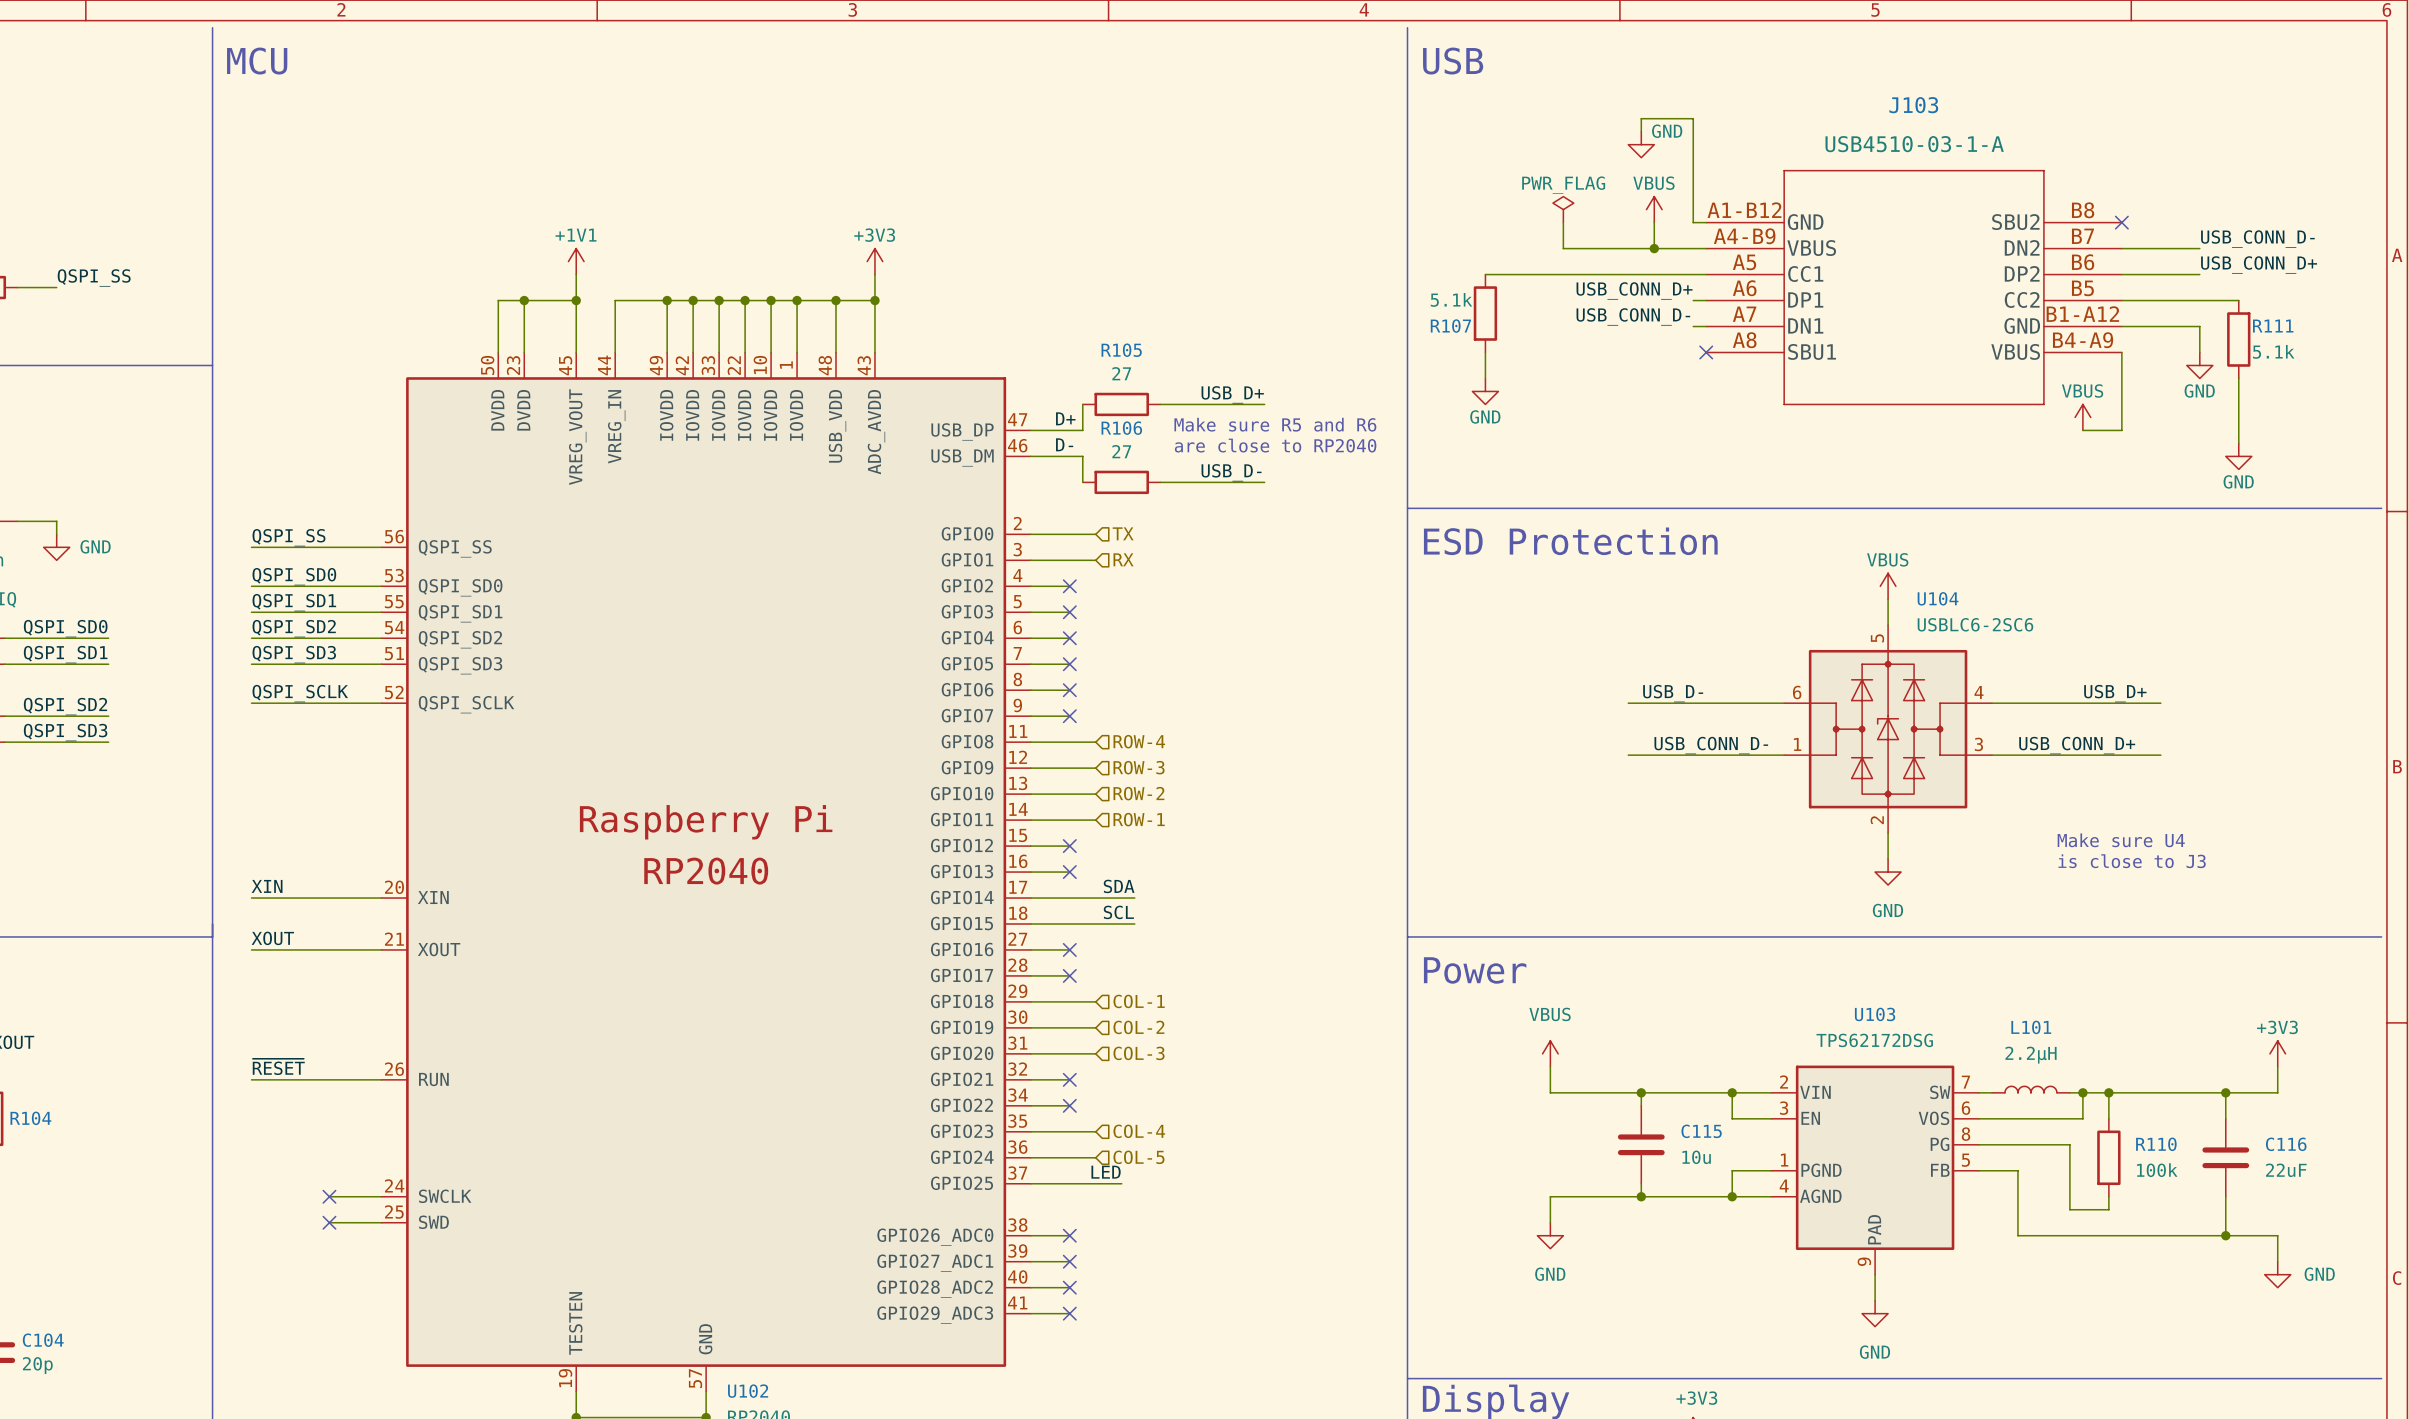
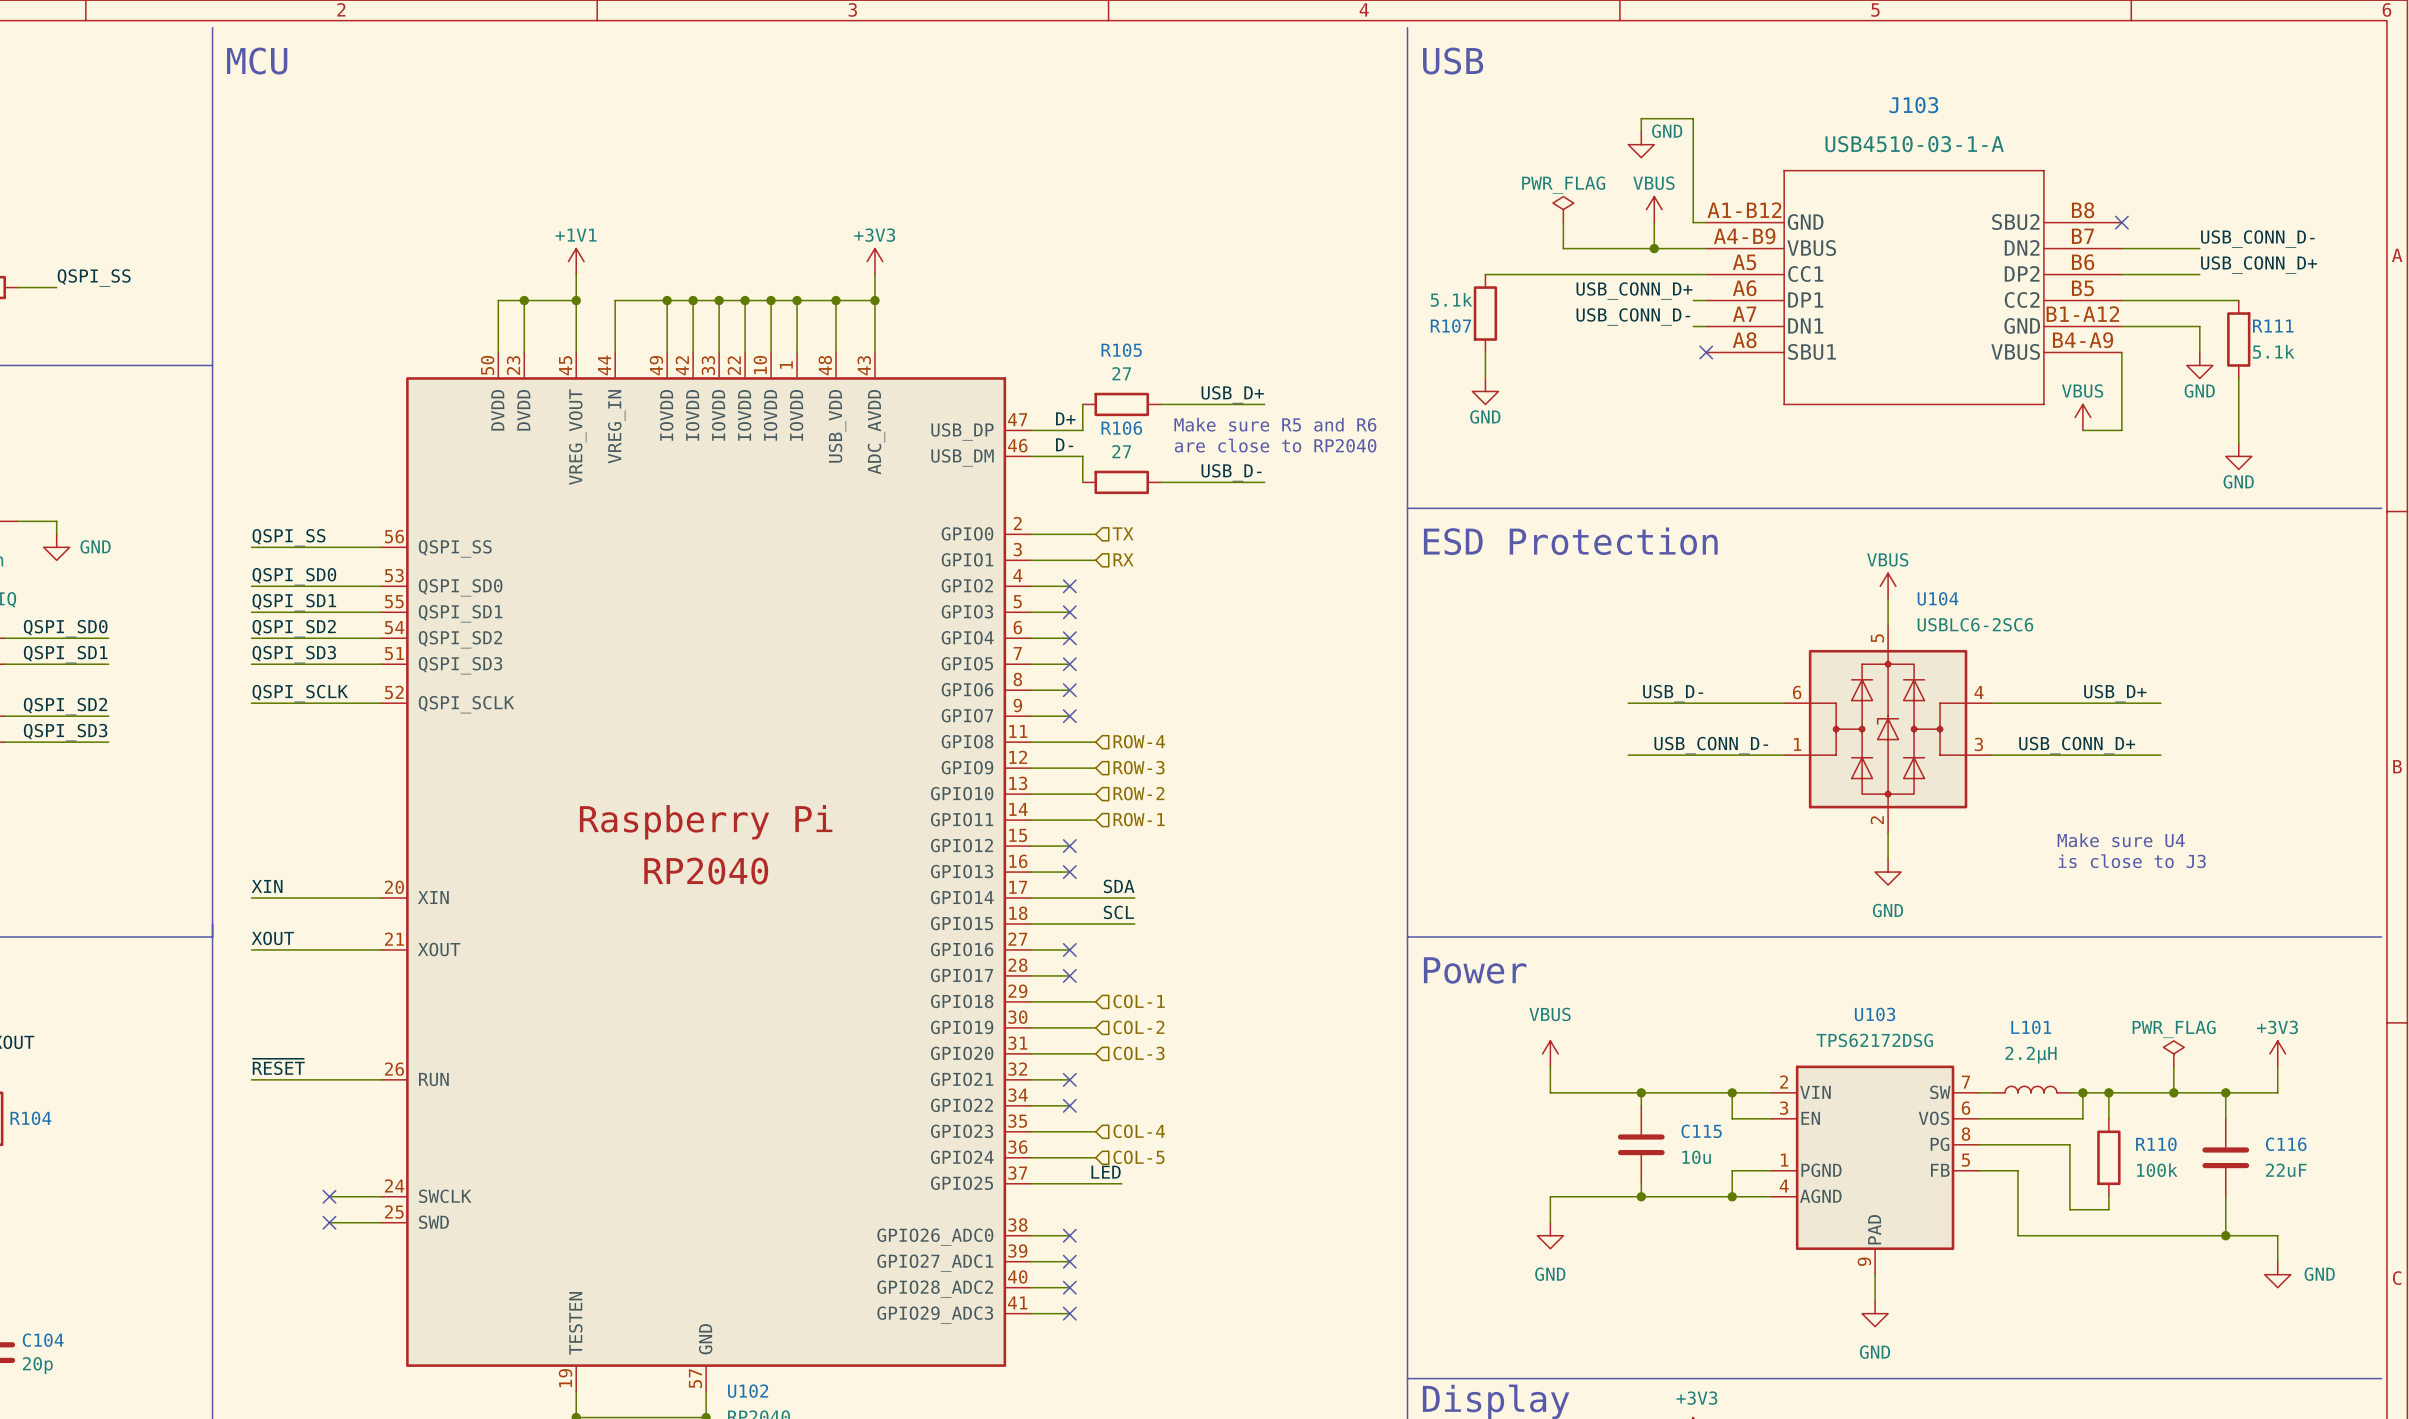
power symbol: none -> PWR_FLAG (2173, 1053)
wire: none -> (2173, 1066) (2173, 1092)
junction: none -> (2173, 1092)

